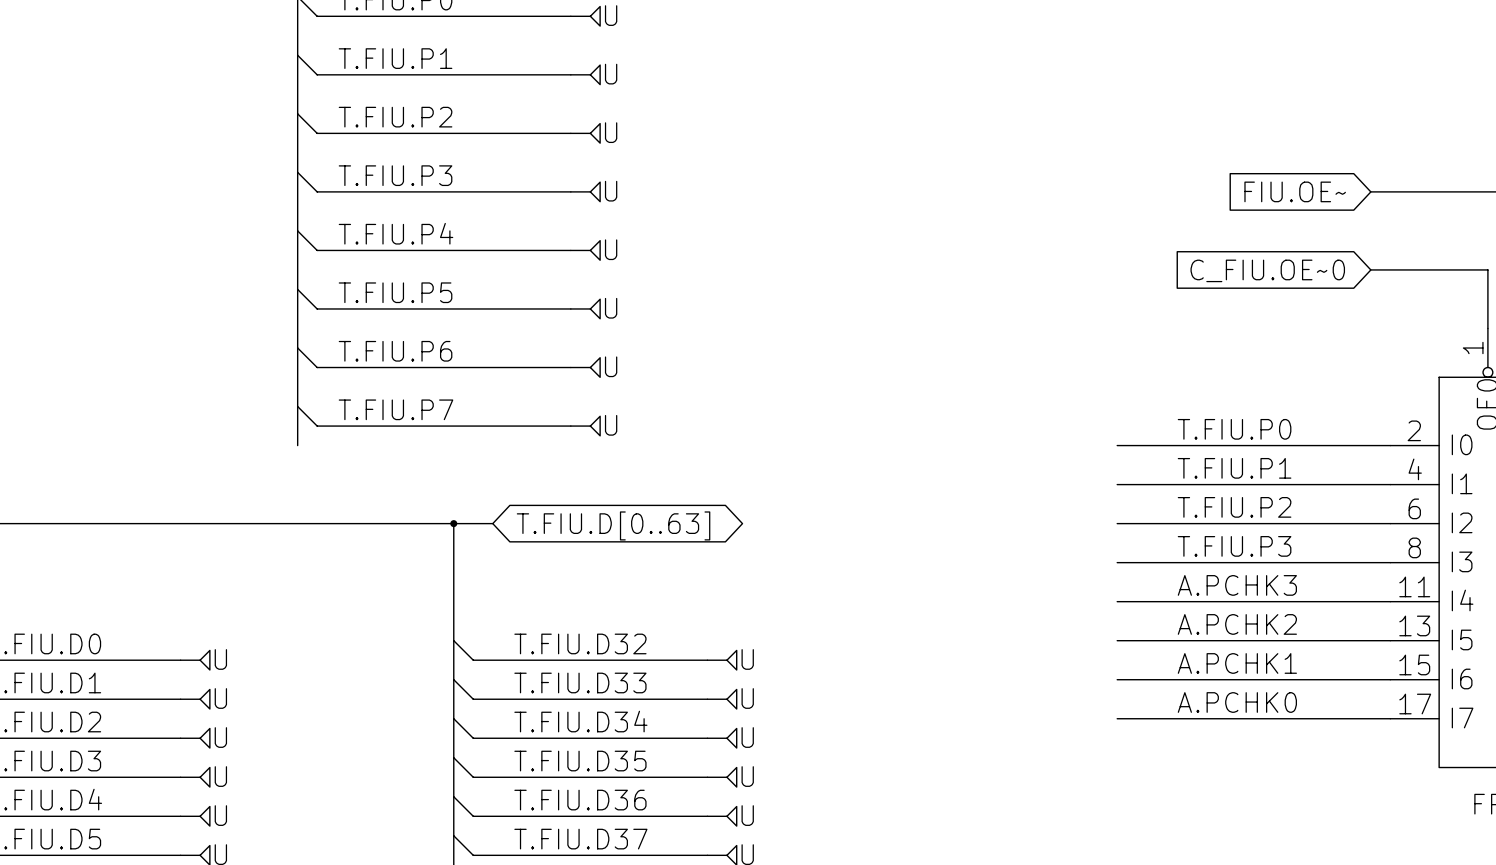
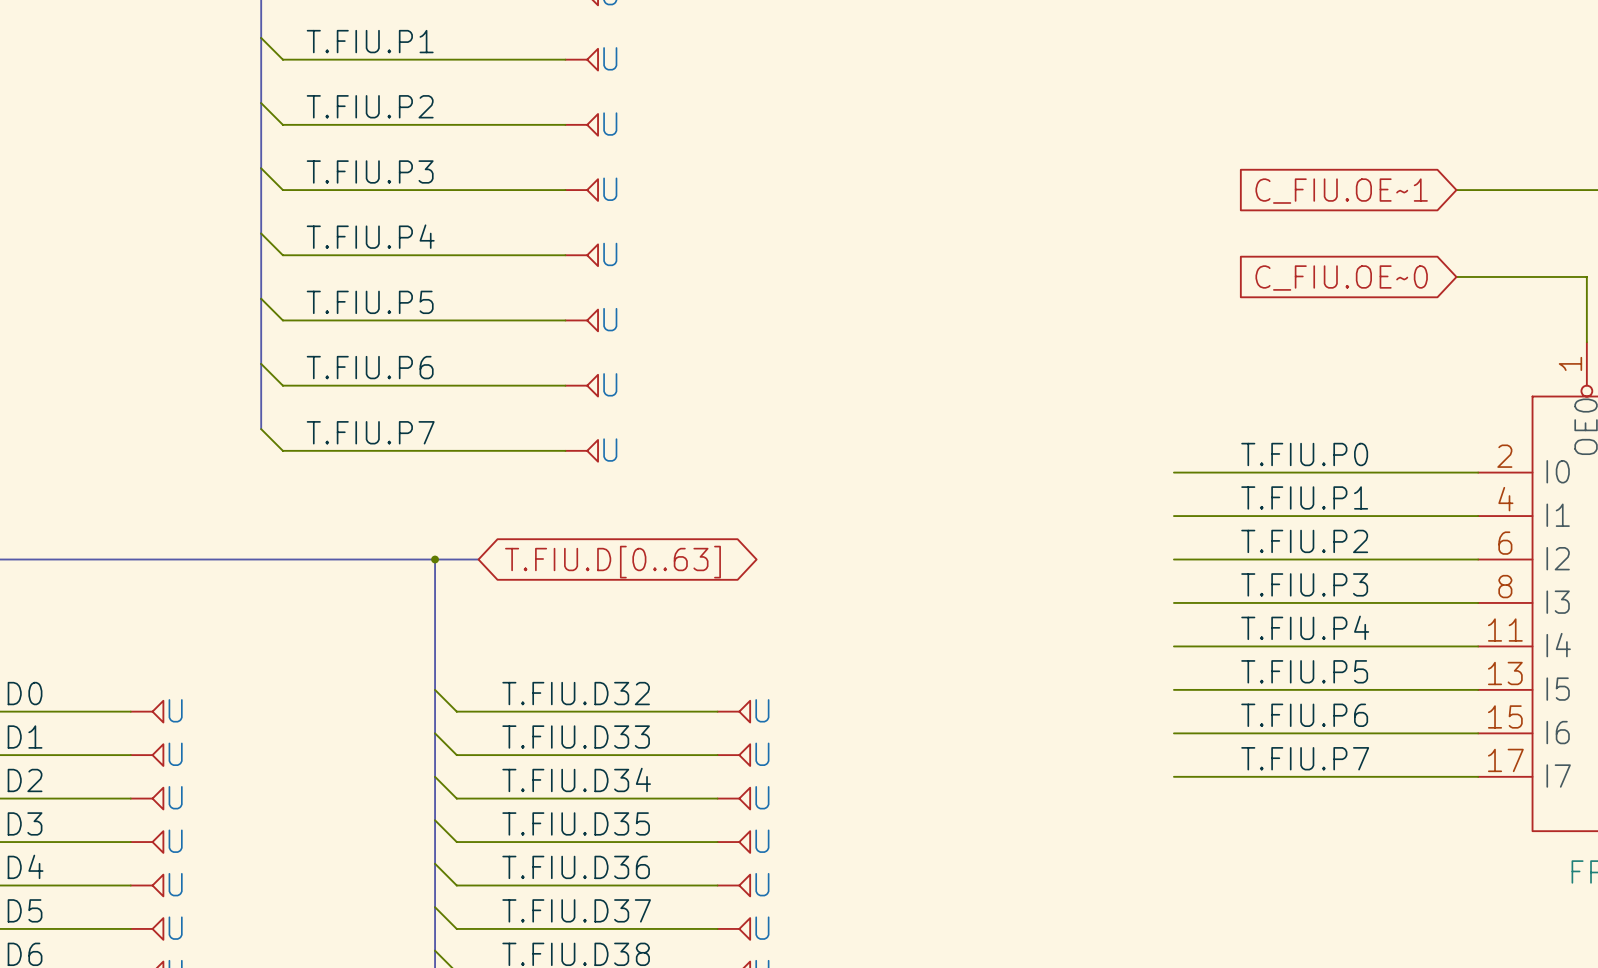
global label: FIU.OE~ (1295, 191) -> C_FIU.OE~1 (1341, 191)
bus: (297, 406) (297, 445) -> none
label: A.PCHK3 (1237, 585) -> T.FIU.P4 (1305, 627)
label: A.PCHK2 (1237, 624) -> T.FIU.P5 (1304, 671)
label: A.PCHK1 (1237, 663) -> T.FIU.P6 (1304, 715)
label: A.PCHK0 (1237, 702) -> T.FIU.P7 (1305, 758)

